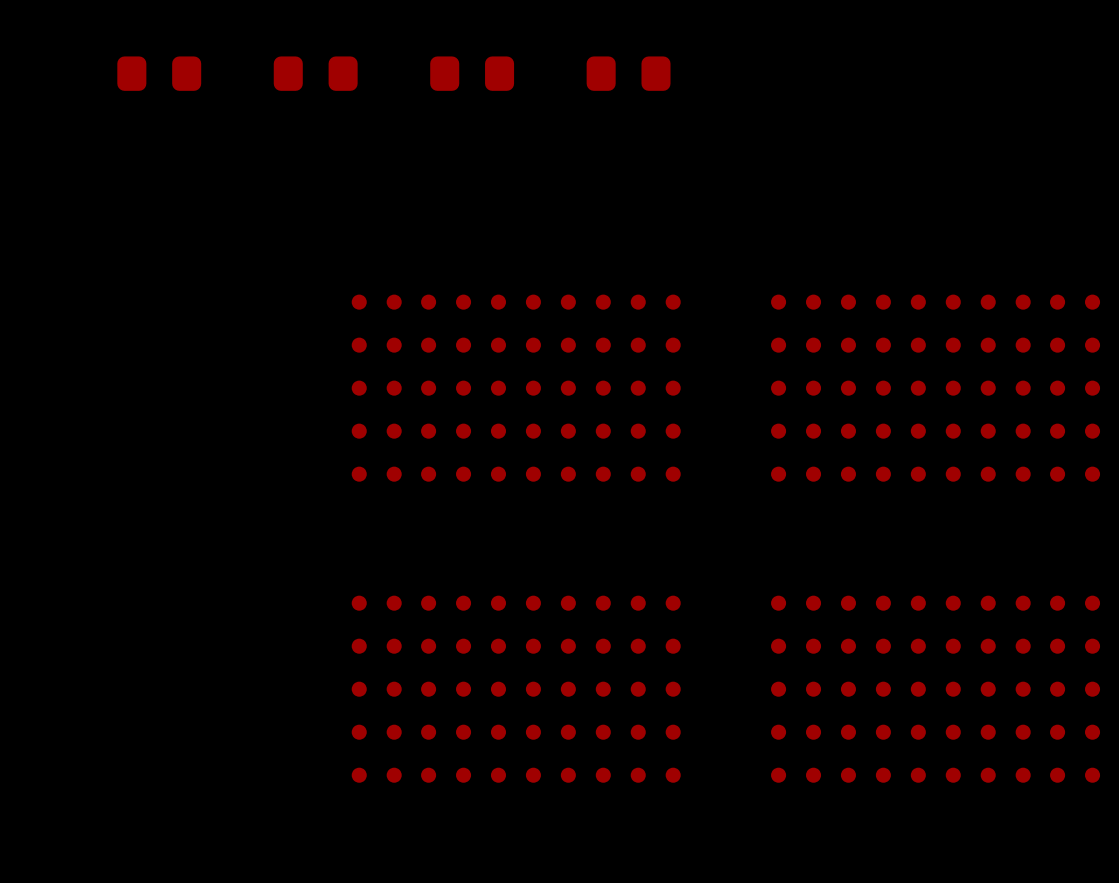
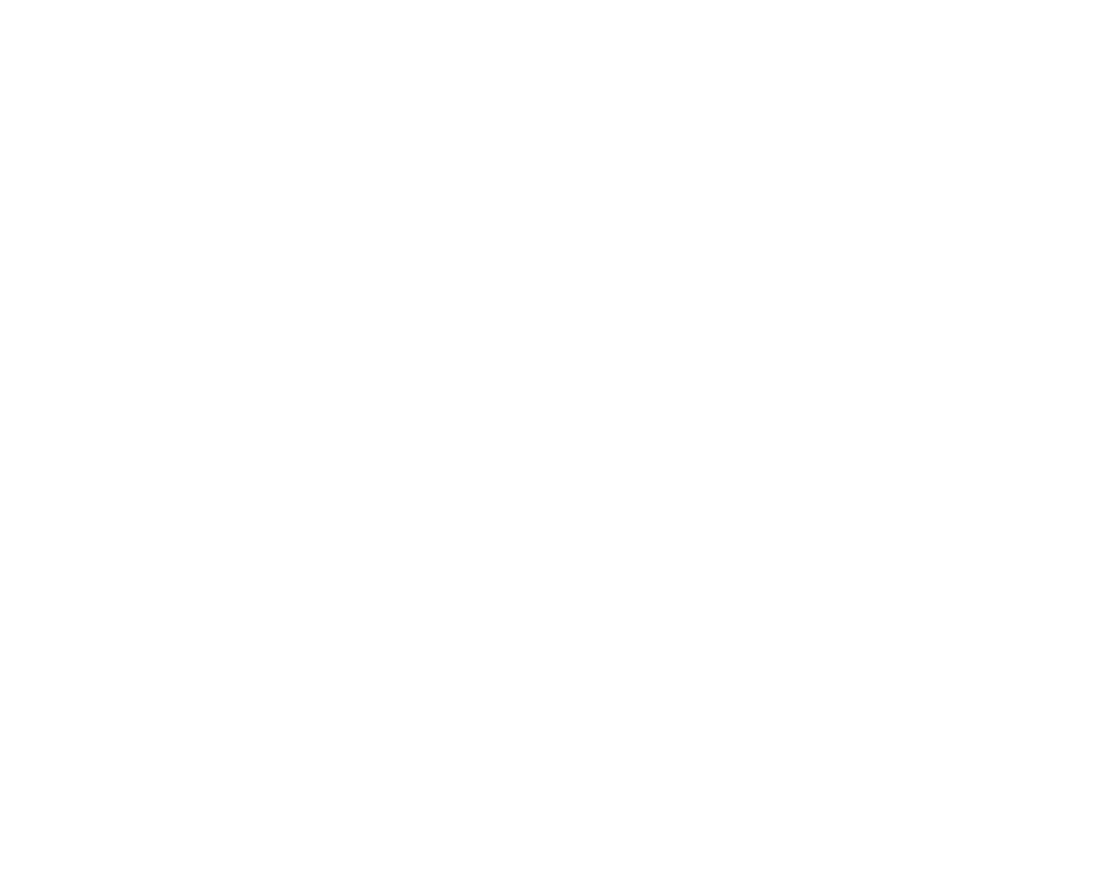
part: (159, 73) -> none
part: (315, 73) -> none
part: (472, 73) -> none
part: (628, 73) -> none
part: (725, 538) -> none

